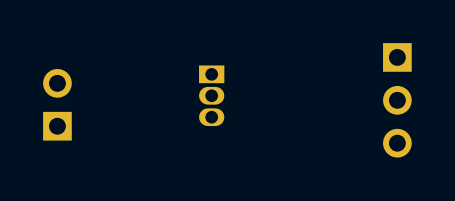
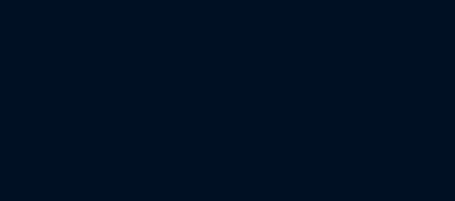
part: (211, 95) -> none
part: (397, 100) -> none
part: (57, 104) -> none

